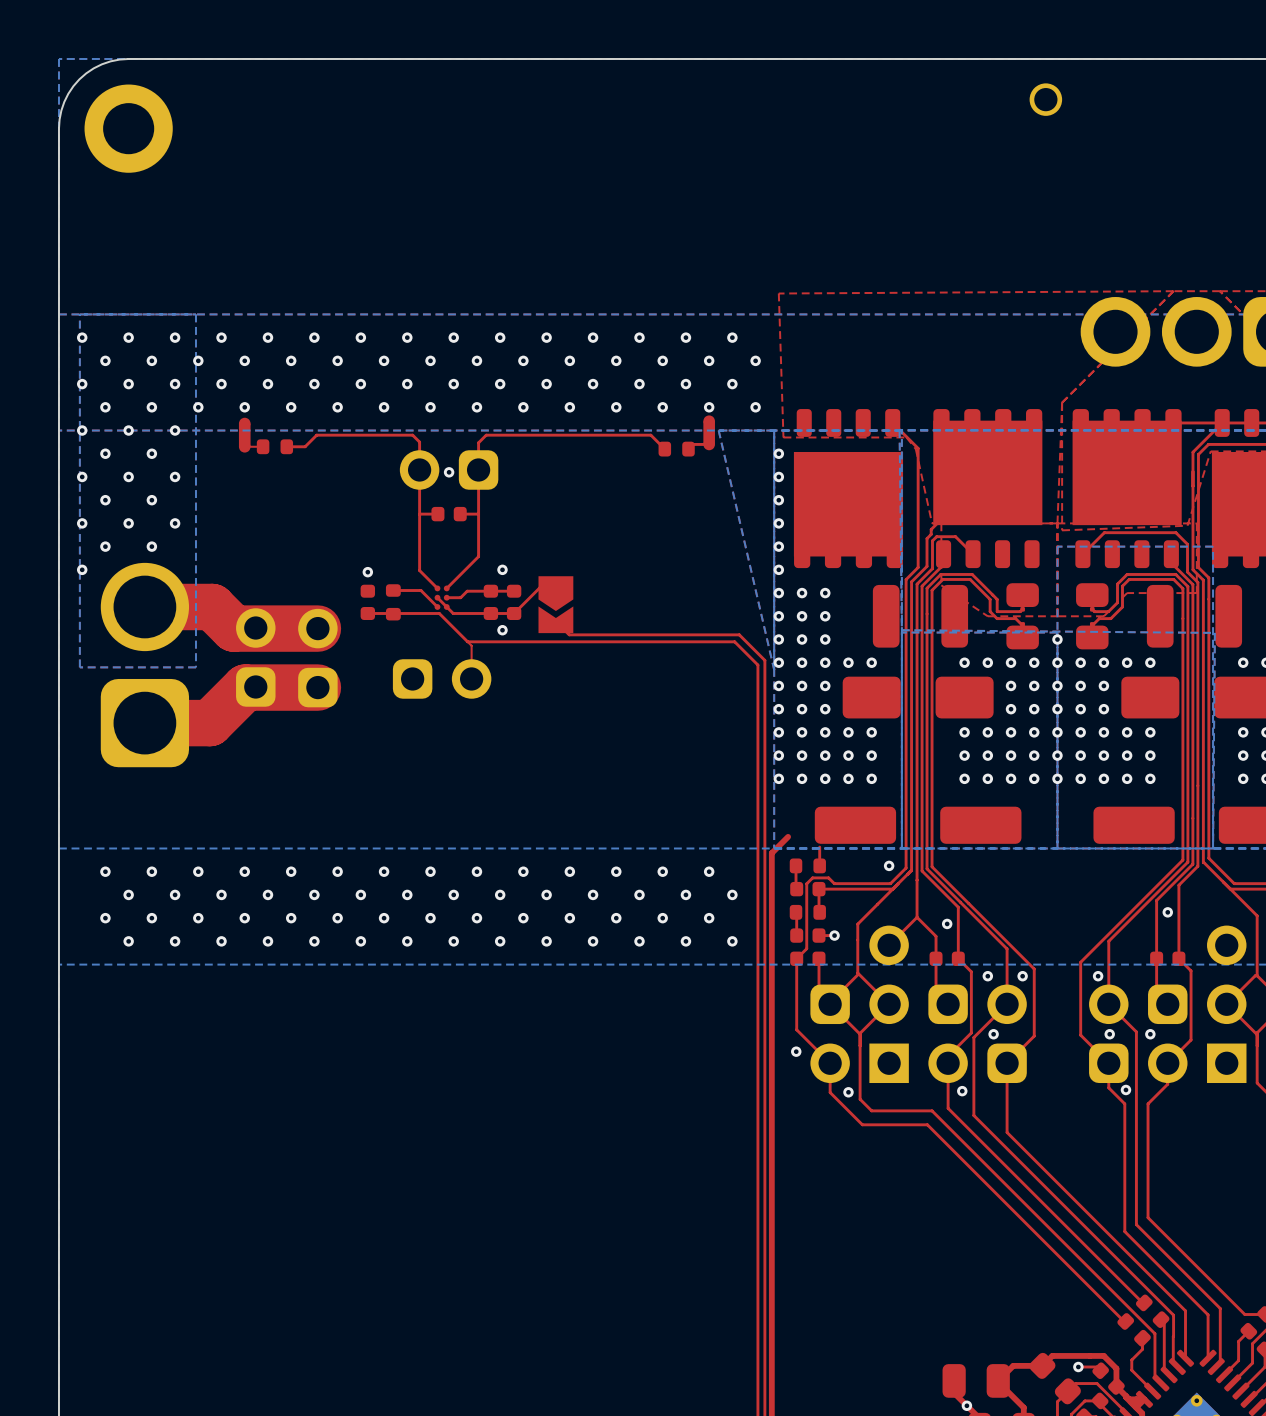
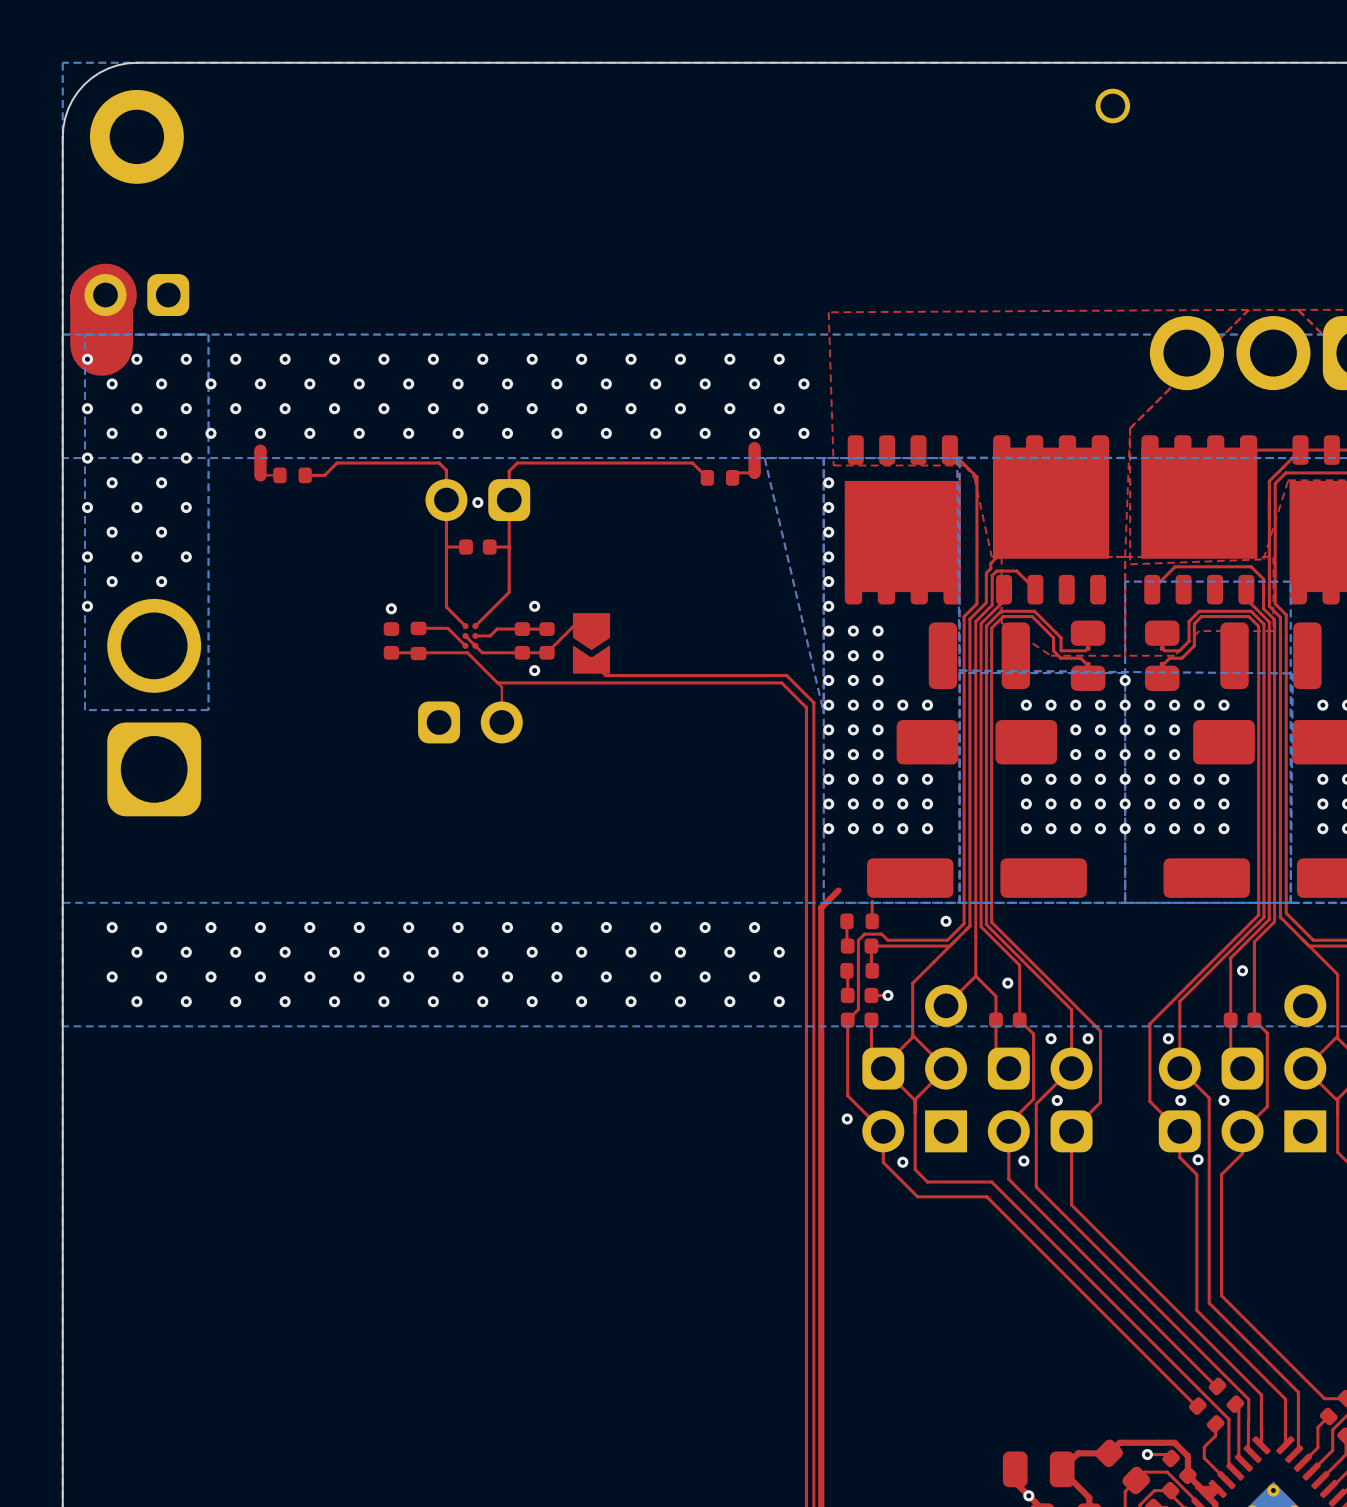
top track: none -> (105, 295) (101, 298) (101, 344)
part: none -> (136, 295)
top track: (144, 606) (212, 606) (233, 628) (317, 628) -> none
part: (255, 657) -> none
part: (317, 658) -> none
top track: (317, 687) (245, 687) (209, 723) (144, 723) -> none

